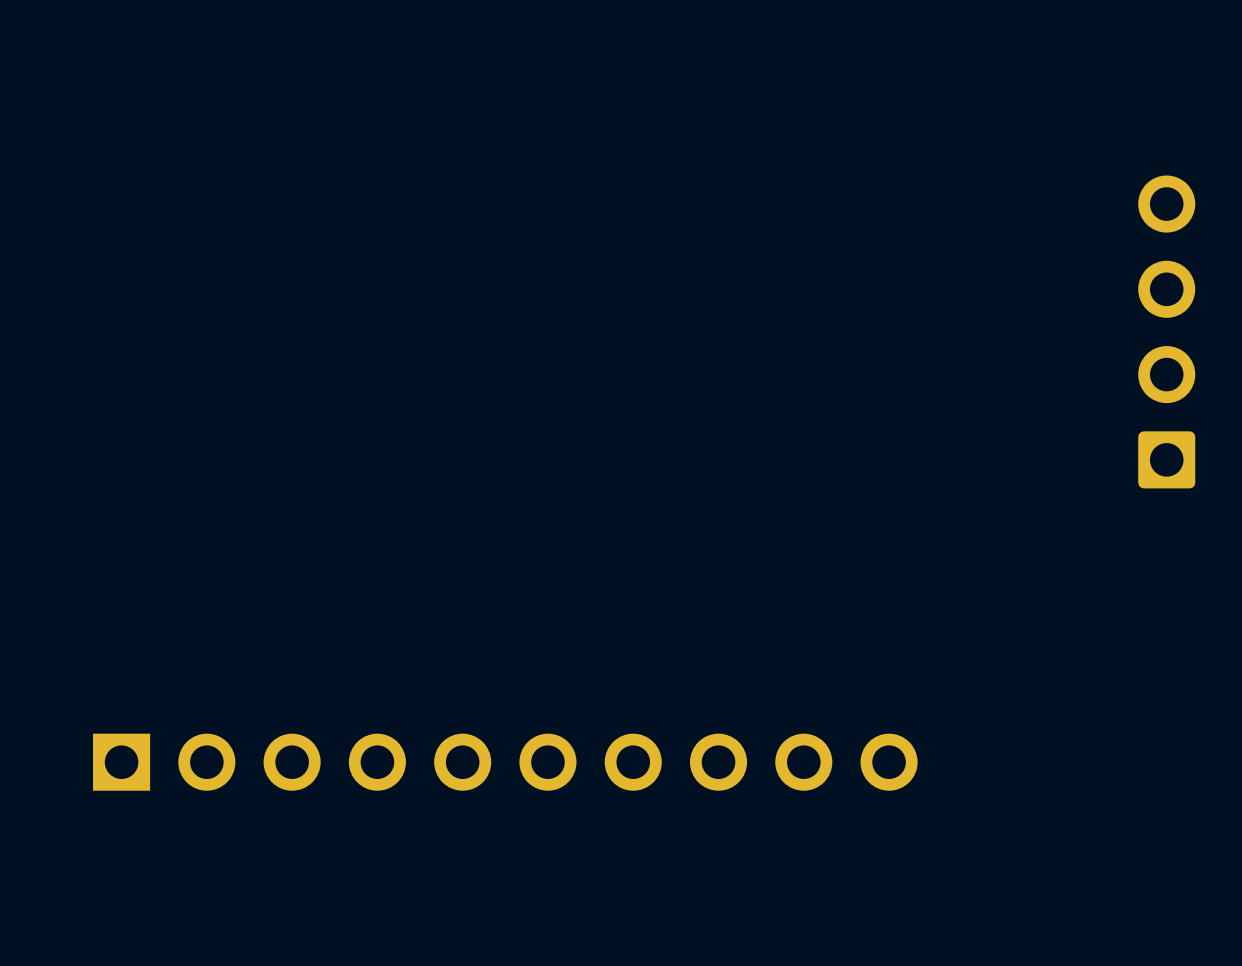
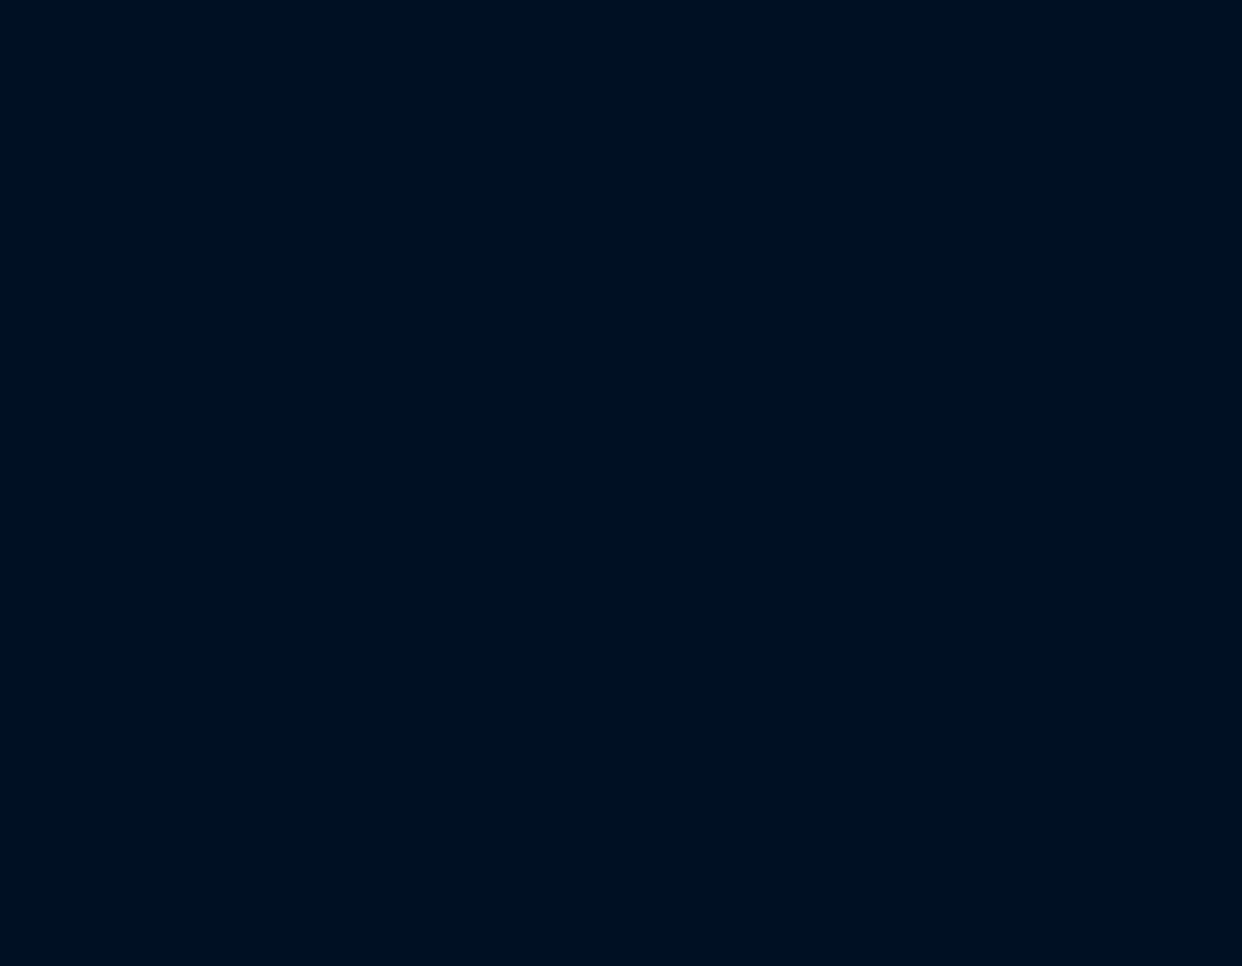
part: (1166, 331) -> none
part: (505, 762) -> none

